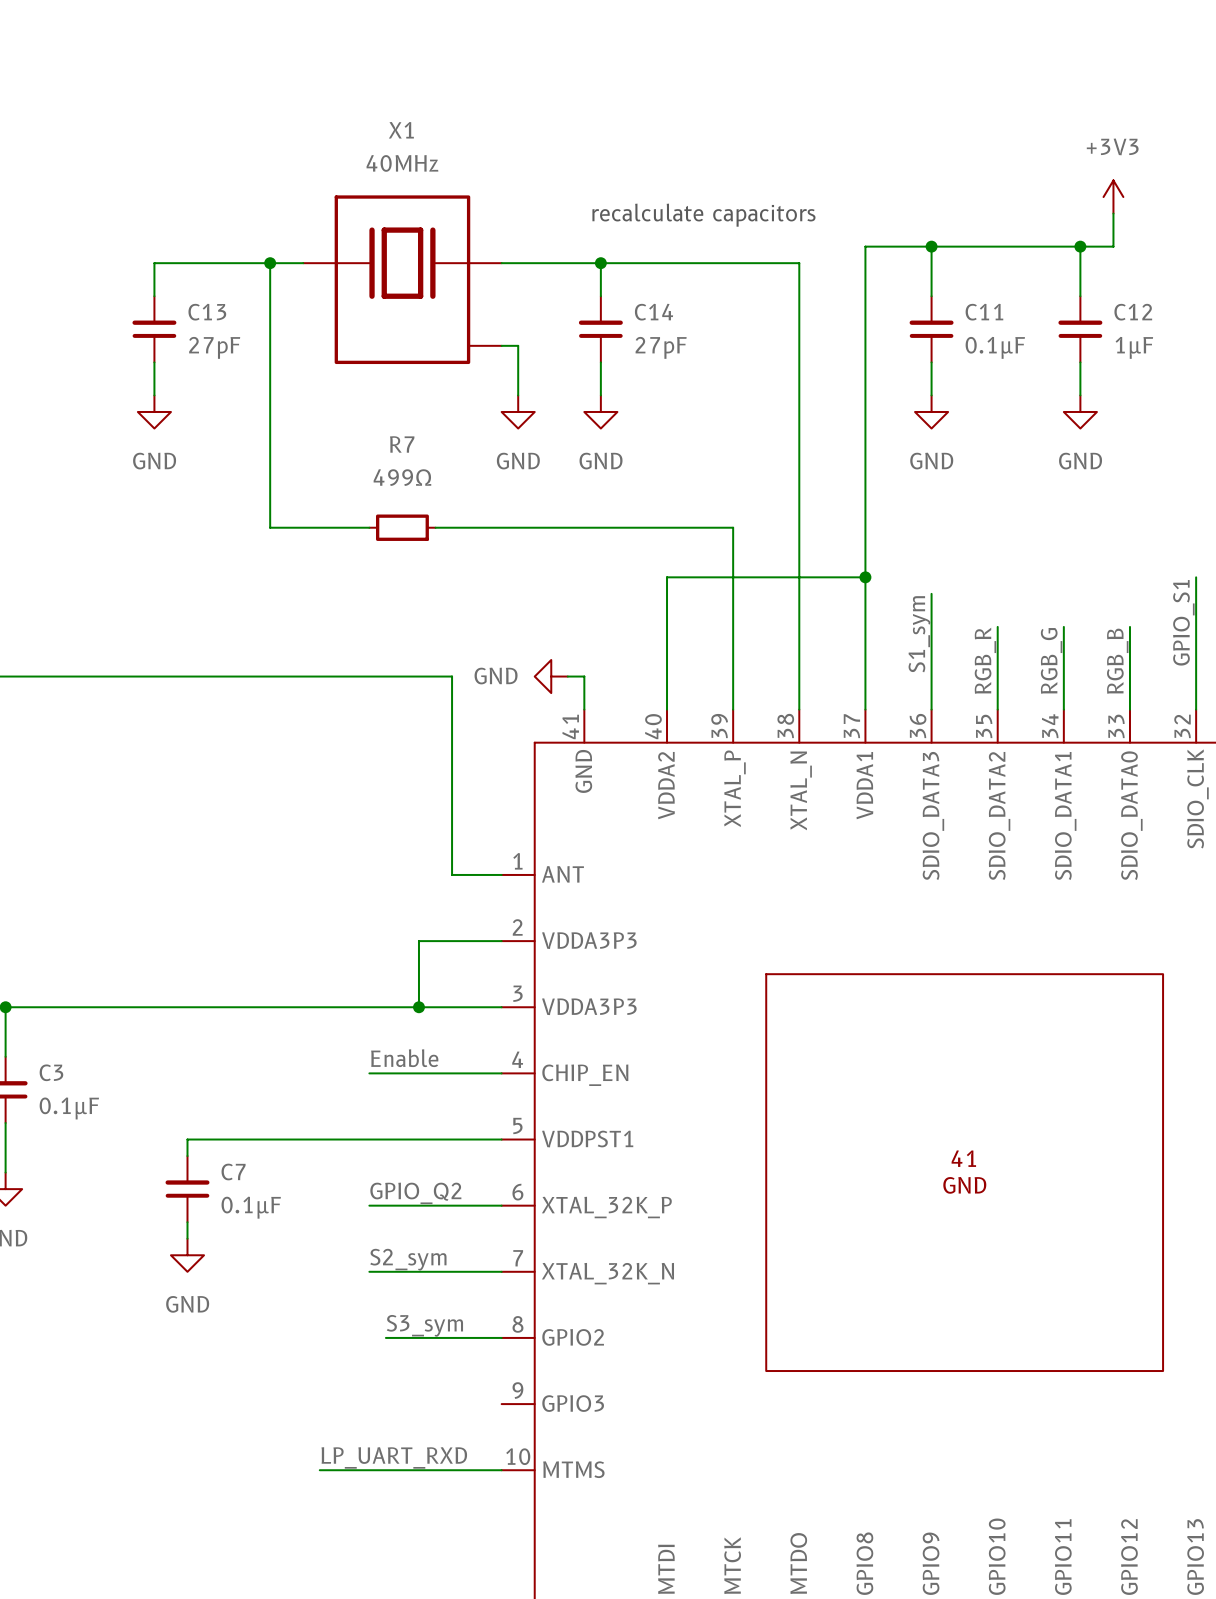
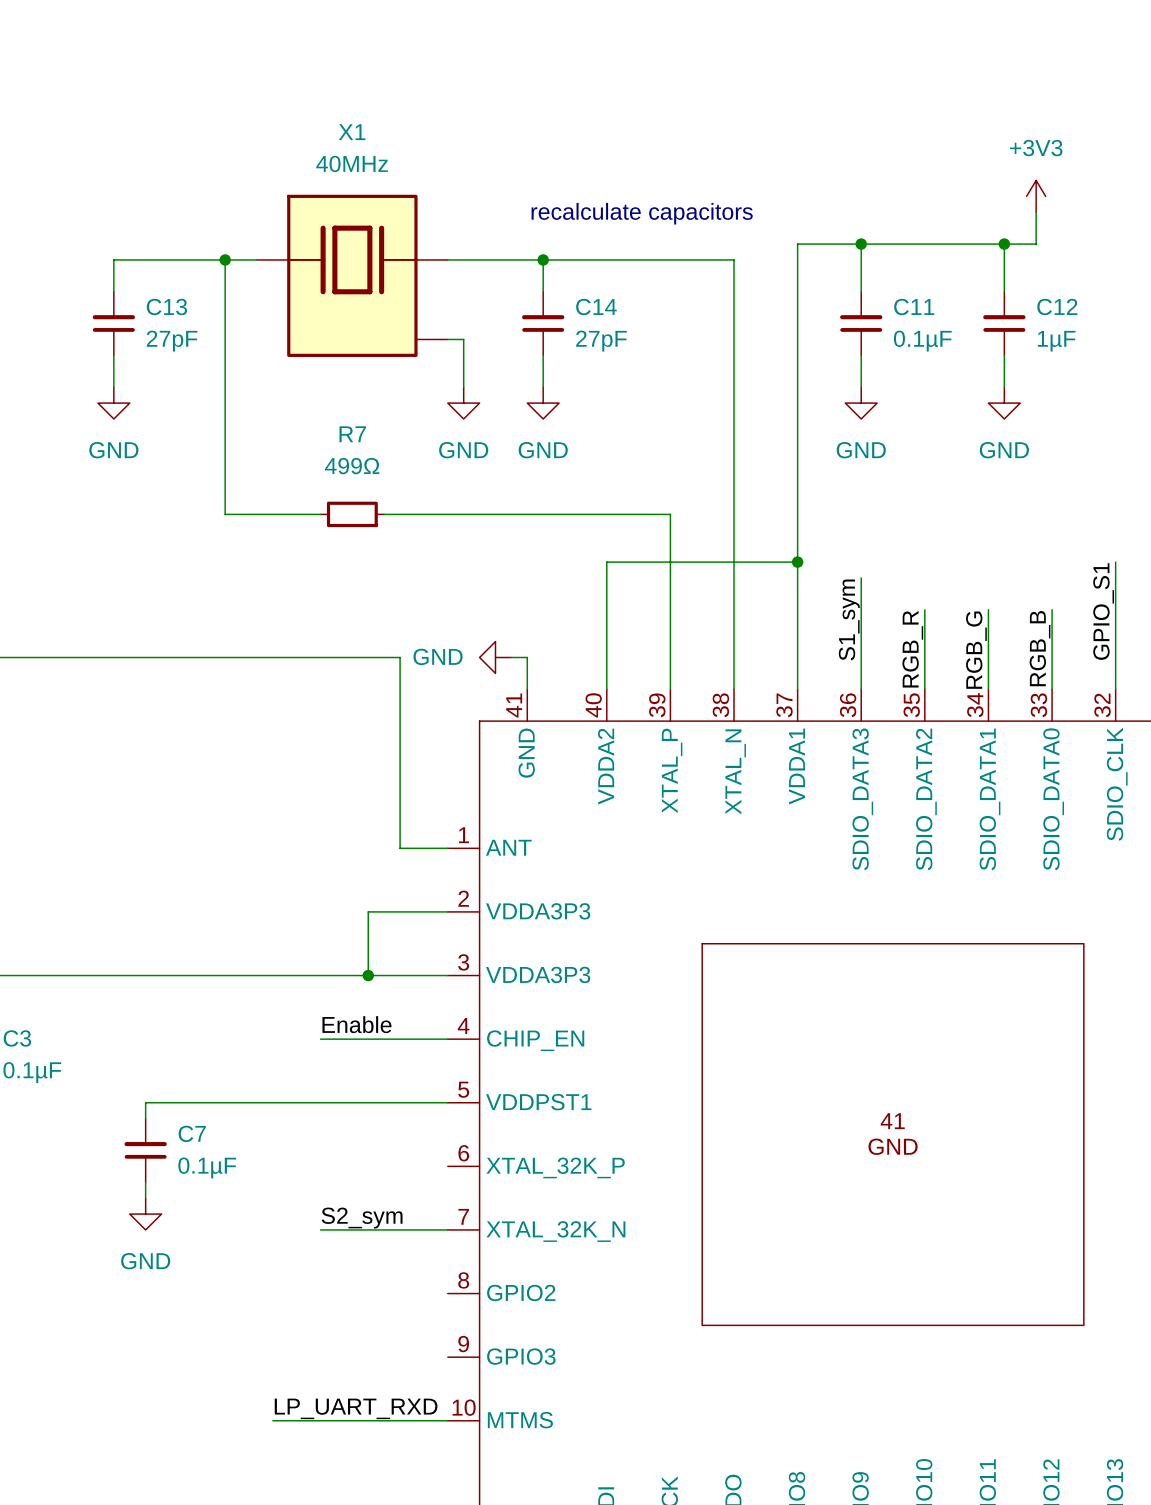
label: GPIO_Q2 (415, 1193) -> none
wire: (369, 1205) (501, 1205) -> none
label: S3_sym (424, 1325) -> none
wire: (385, 1337) (501, 1337) -> none

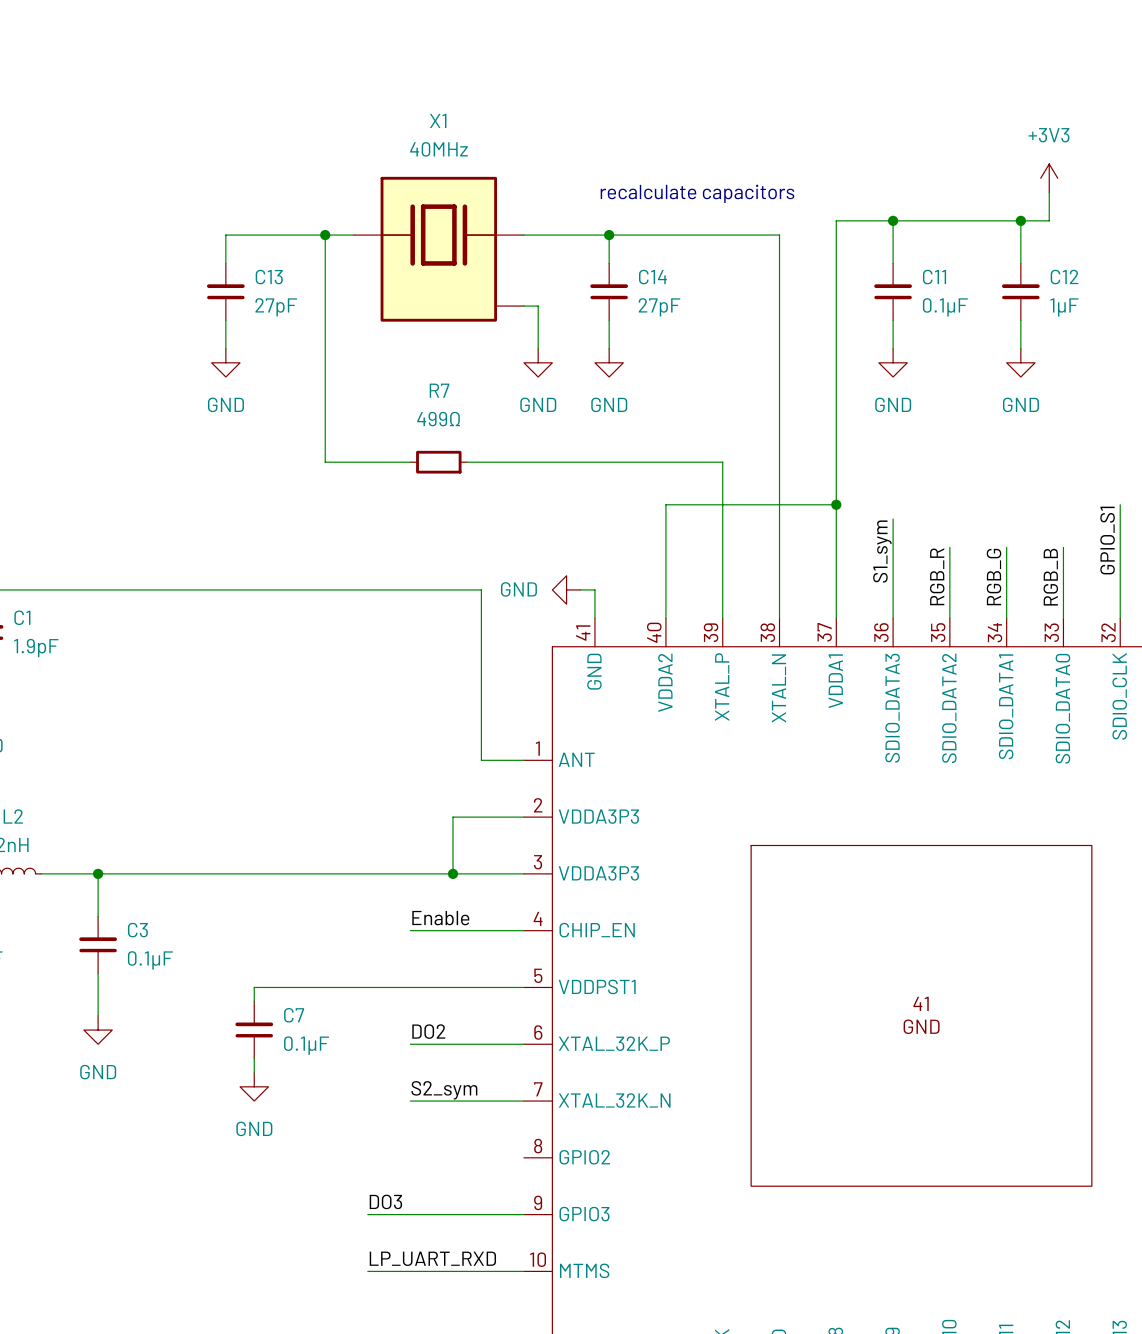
label: none -> DO2 (428, 1031)
wire: none -> (410, 1044) (523, 1044)
label: none -> DO3 (385, 1201)
wire: none -> (367, 1214) (523, 1214)

